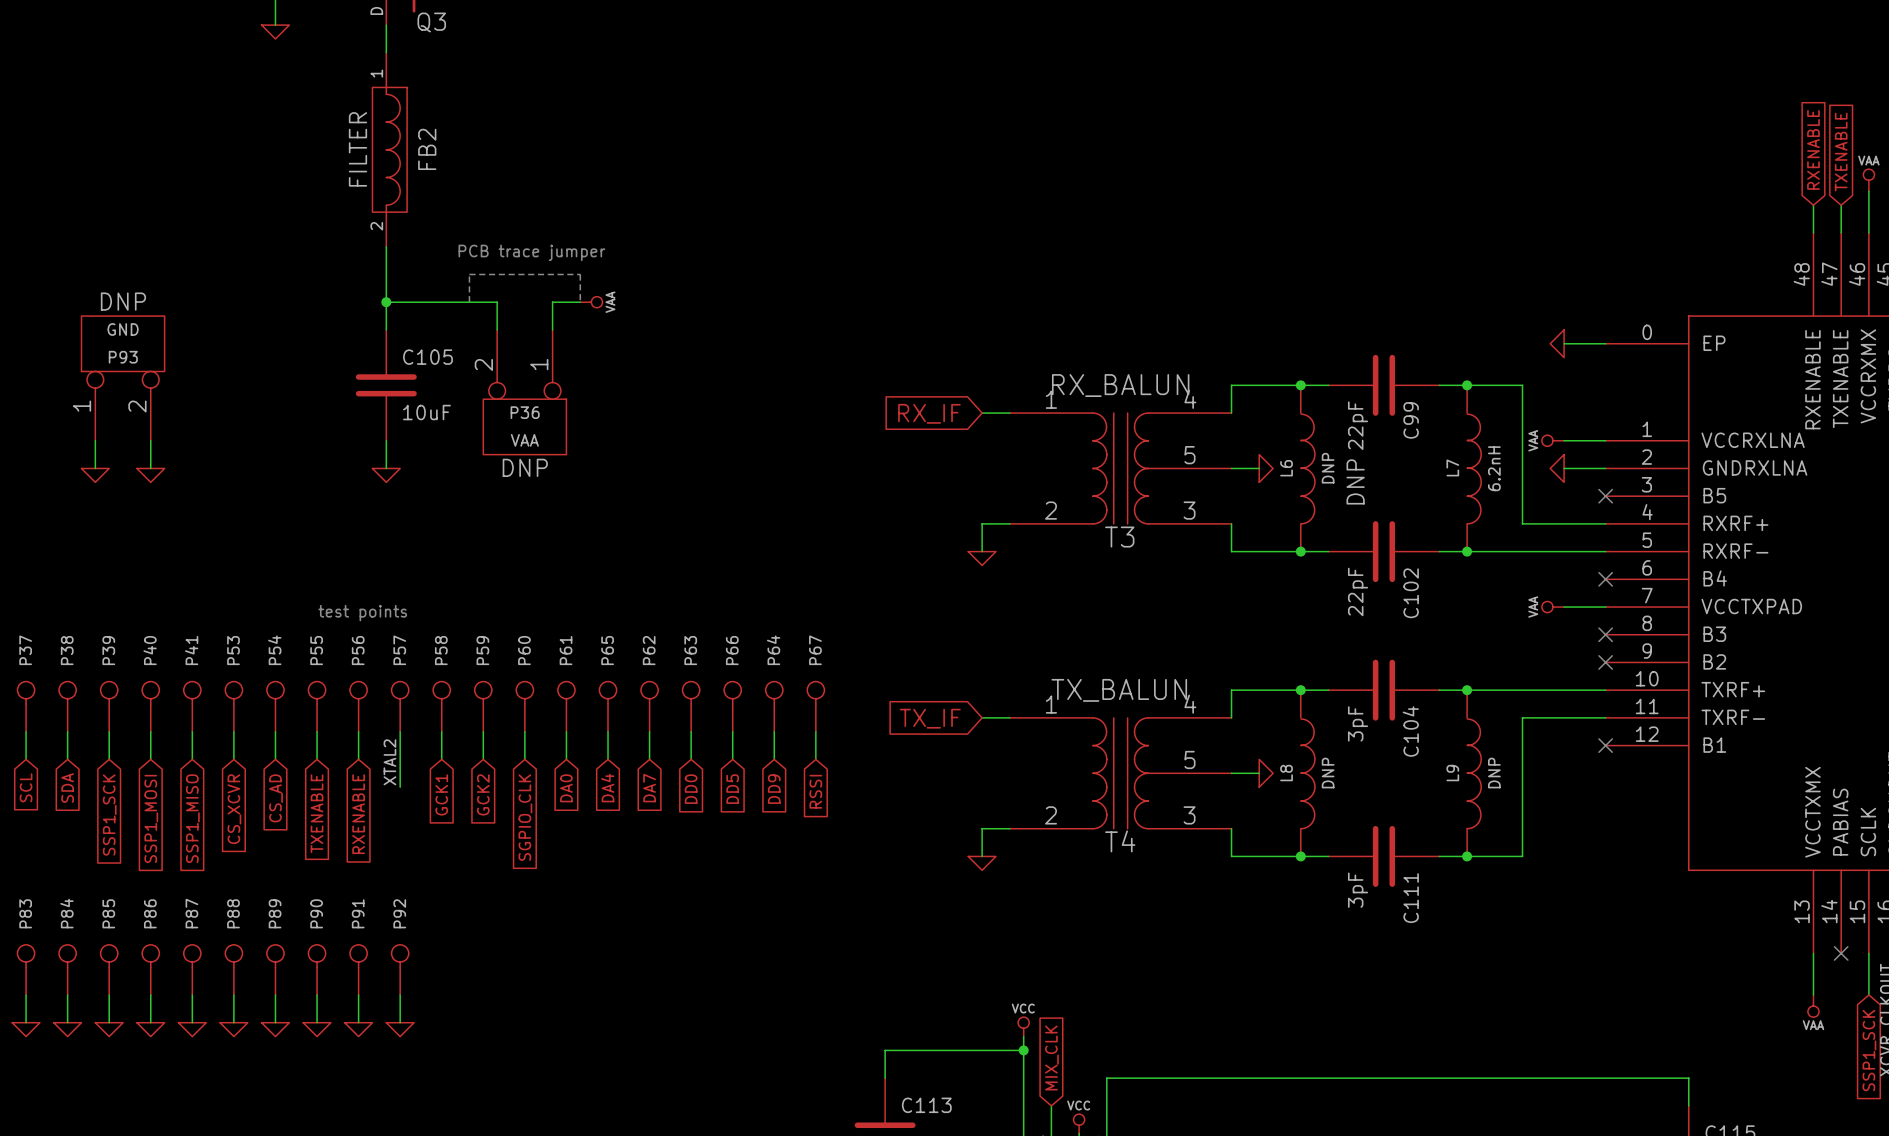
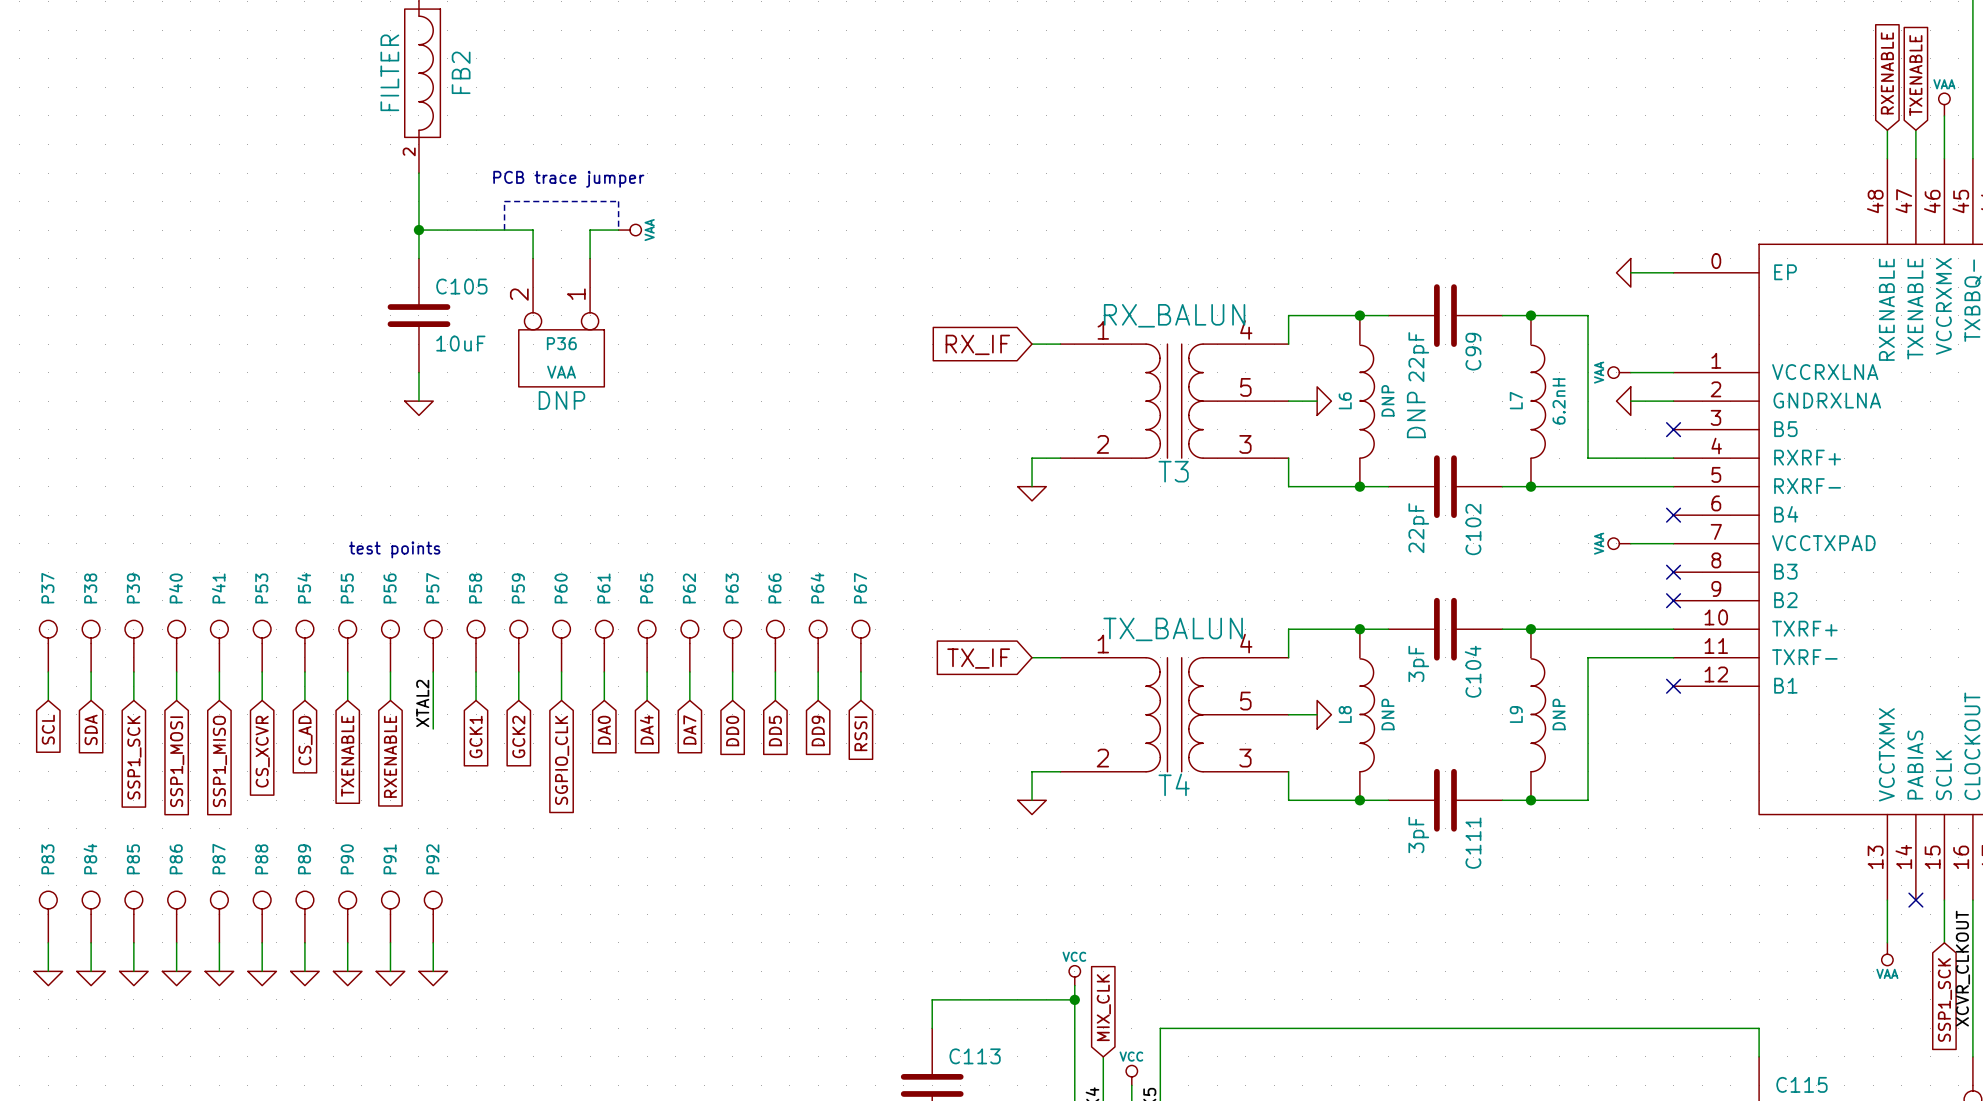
P93: GND (123, 378) -> none
wire: (95, 440) (95, 468) -> none
wire: (150, 440) (150, 468) -> none
power symbol: (95, 475) -> none
power symbol: (150, 475) -> none

